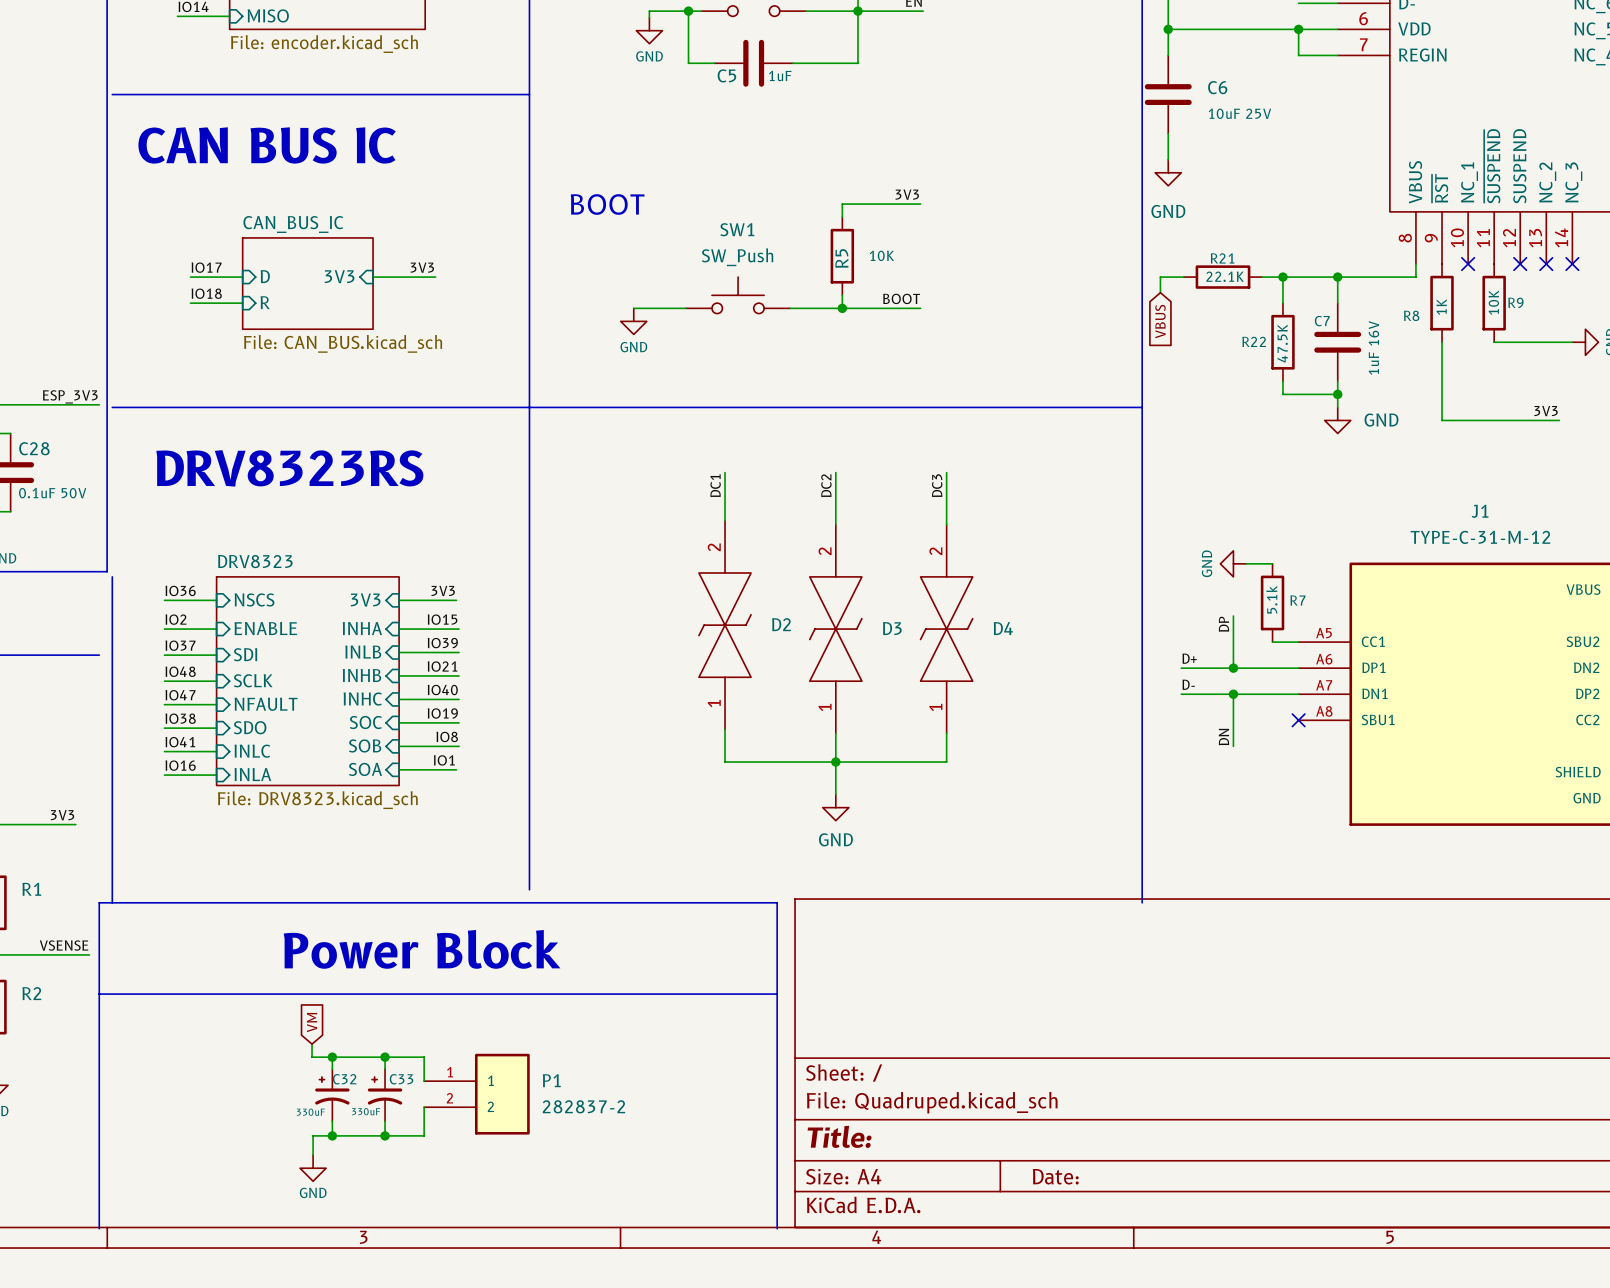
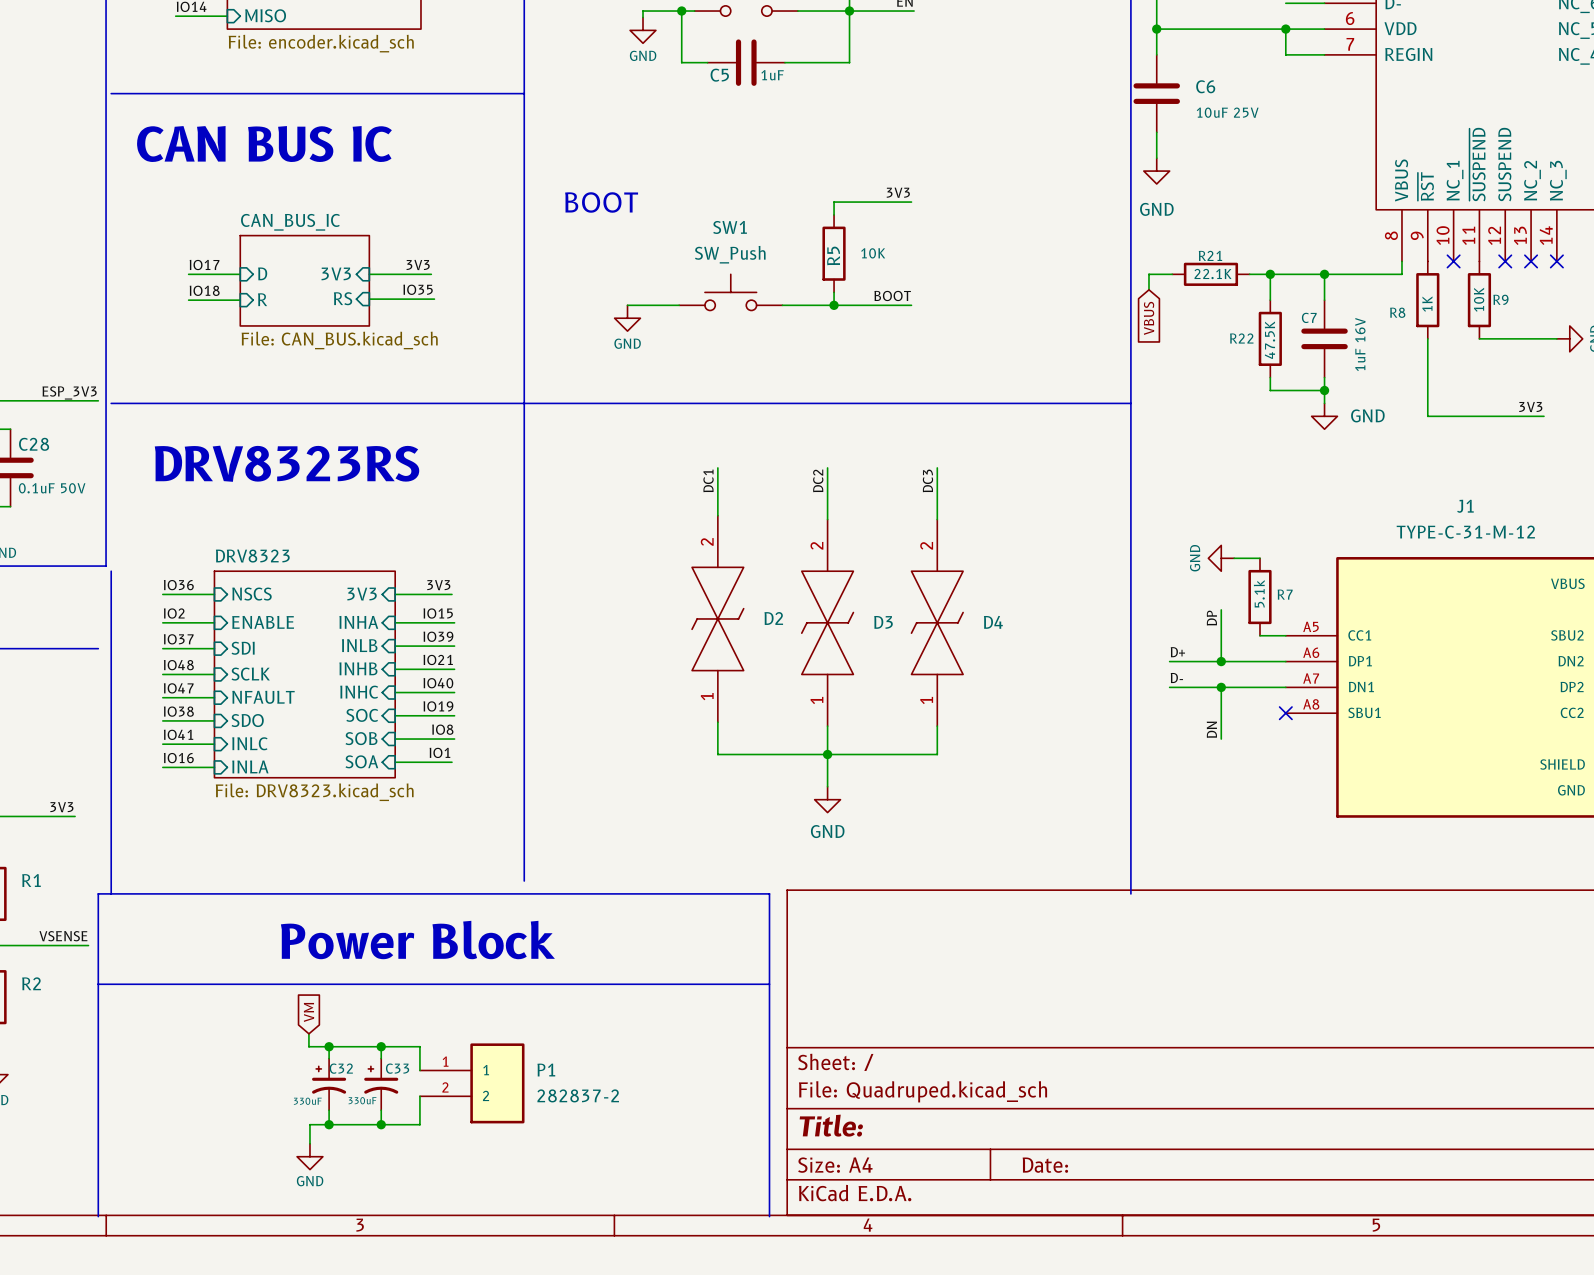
label: none -> IO35 (418, 289)
sheet pin: none -> RS (343, 298)
wire: none -> (369, 299) (434, 299)

